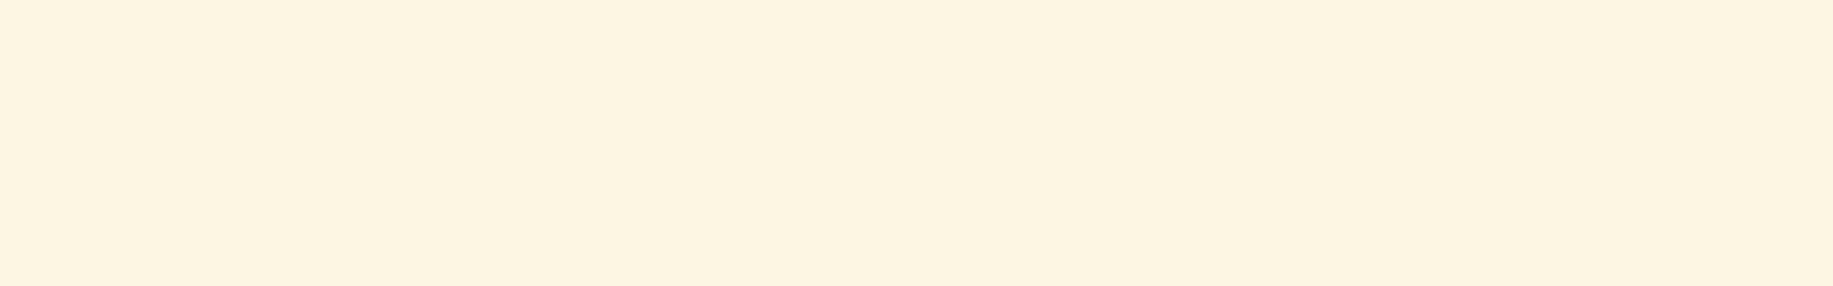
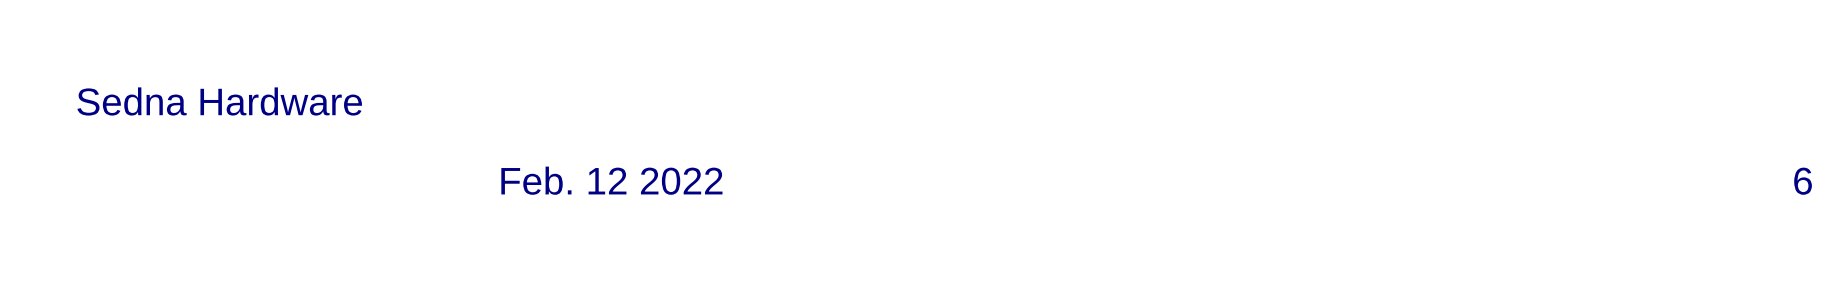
text: none -> Sedna Hardware (219, 101)
text: none -> Feb. 12 2022 (611, 180)
text: none -> 6 (1803, 181)

